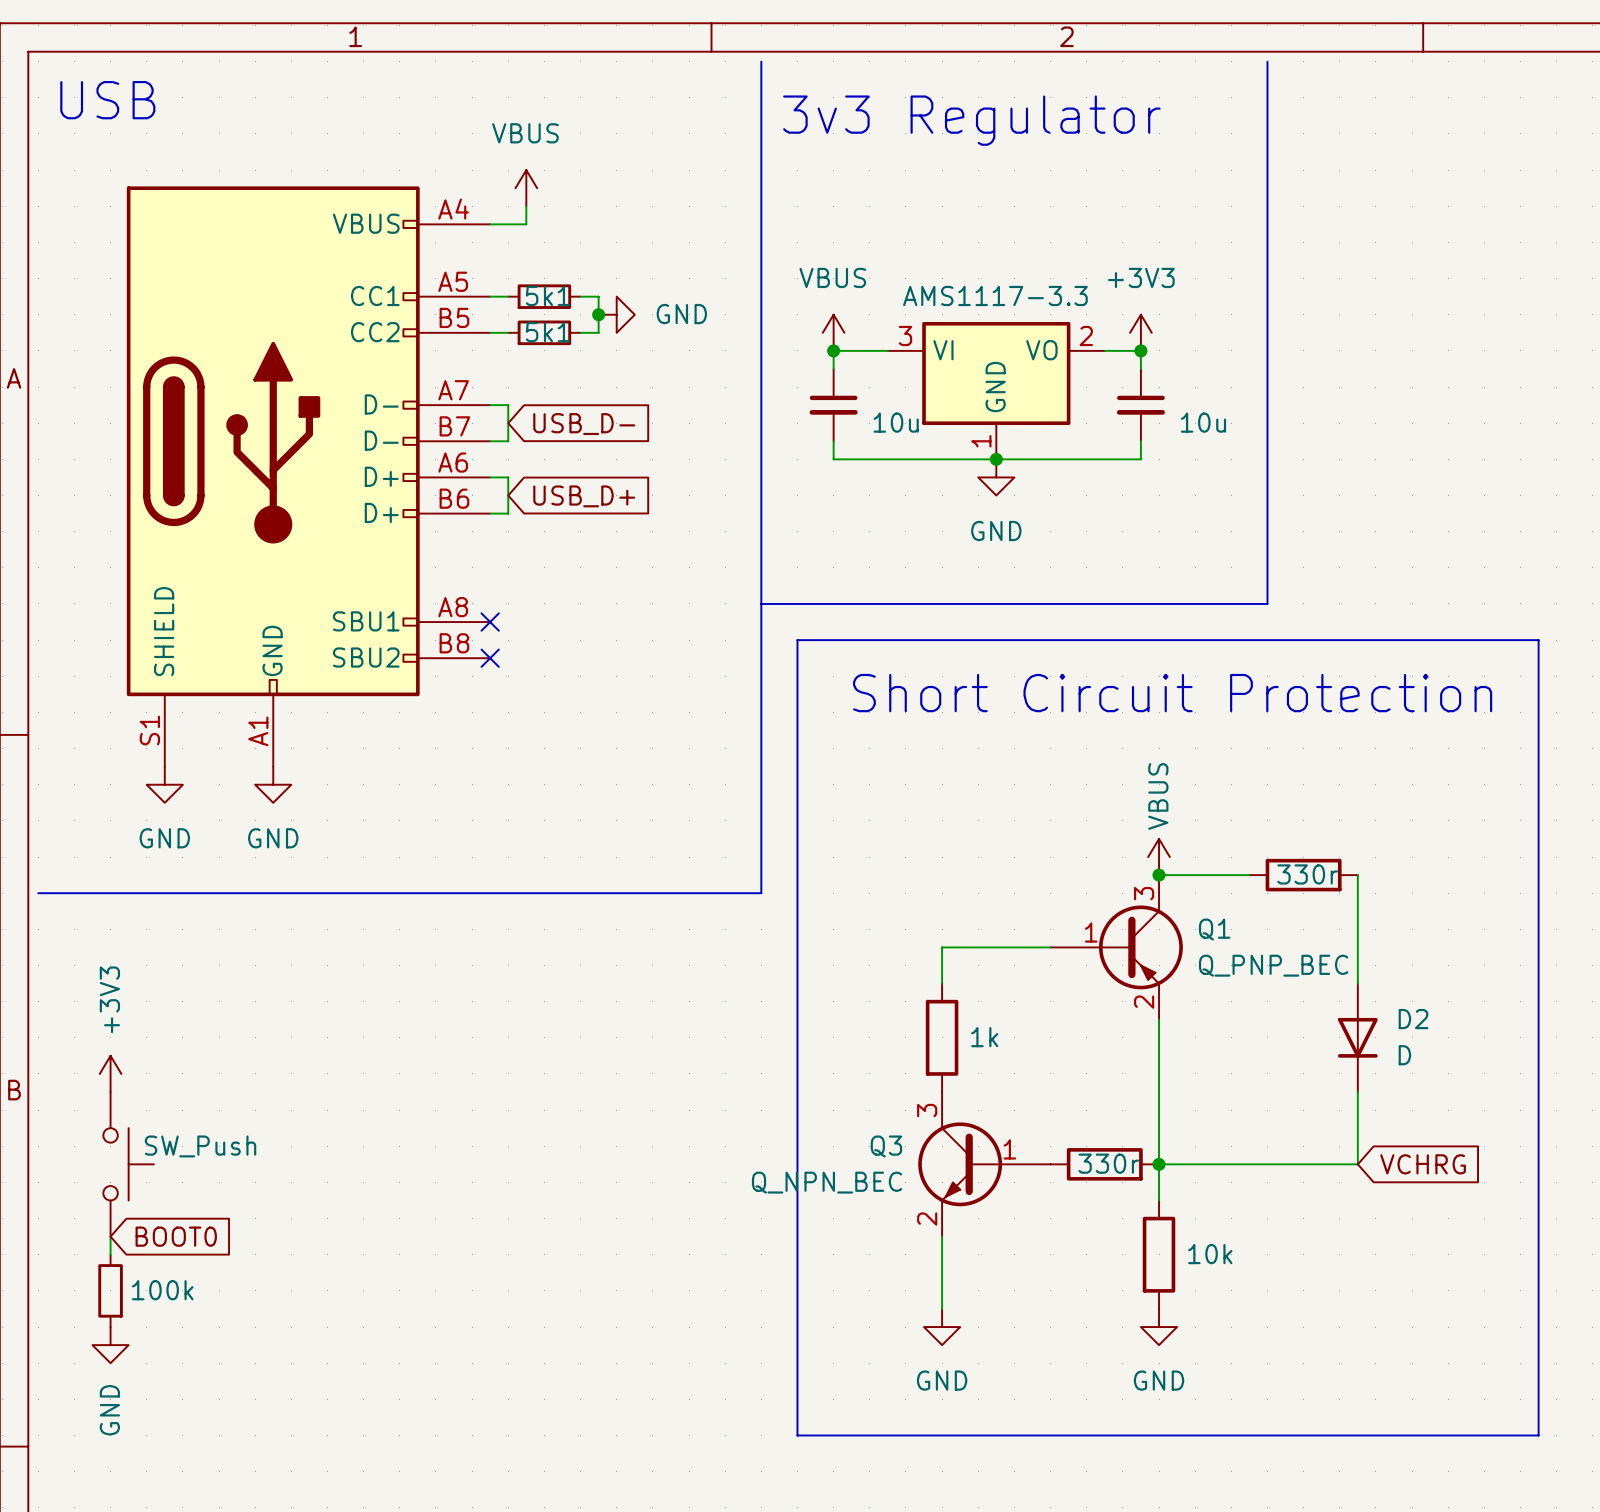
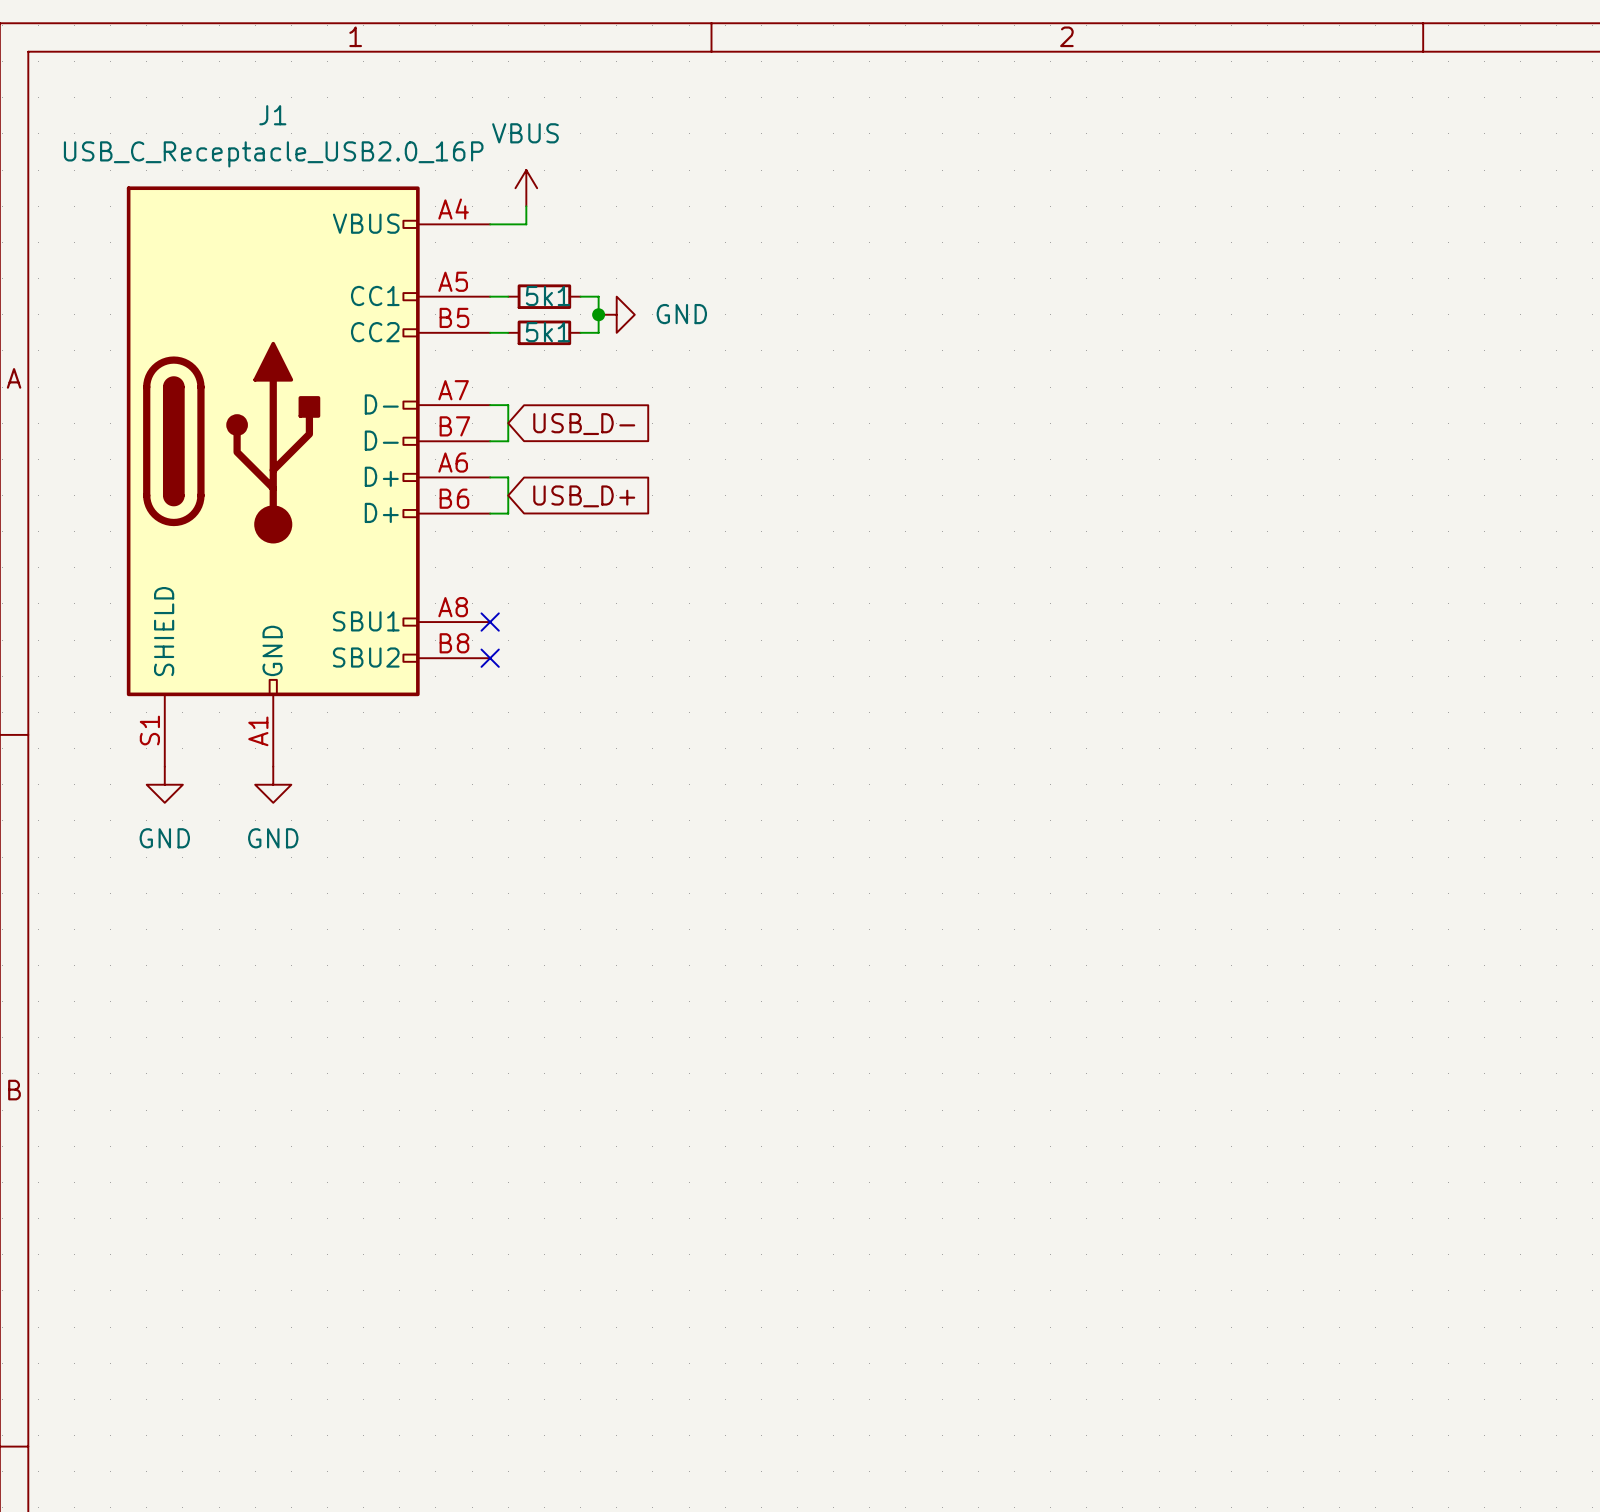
line: (761, 61) (761, 893) (38, 893) -> none
line: (1267, 61) (1267, 603) (761, 603) -> none
text: USB (107, 100) -> none
J1 name: none -> J1 (272, 115)
text: 3v3 Regulator (971, 120) -> none
J1 value: none -> USB_C_Receptacle_USB2.0_16P (273, 154)
power symbol: VBUS (833, 332) -> none
power symbol: +3V3 (1140, 332) -> none
junction: (833, 350) -> none
wire: (887, 350) (833, 350) (833, 368) -> none
wire: (1104, 350) (1140, 350) (1140, 368) -> none
junction: (1140, 350) -> none
part: AMS1117-3.3 (996, 390) -> none
part: 10u (833, 405) -> none
part: 10u (1140, 405) -> none
wire: (833, 441) (833, 459) (1140, 459) (1140, 441) -> none
junction: (996, 459) -> none
power symbol: GND (996, 477) -> none
line: (797, 640) (1538, 640) (1538, 1435) (797, 1435) (797, 640) -> none
text: Short Circuit Protection (1172, 693) -> none
power symbol: VBUS (1159, 857) -> none
wire: (1159, 875) (1249, 875) -> none
junction: (1159, 875) -> none
part: 330r (1303, 875) -> none
wire: (1357, 875) (1357, 983) -> none
wire: (1050, 947) (942, 947) (942, 983) -> none
Q1: Q_PNP_BEC (1116, 947) -> none
wire: (1159, 1019) (1159, 1200) -> none
part: 1k (942, 1037) -> none
D2: D (1357, 1037) -> none
power symbol: +3V3 (110, 1073) -> none
wire: (1357, 1092) (1357, 1164) (1159, 1164) -> none
part: SW_Push (128, 1164) -> none
Q3: Q_NPN_BEC (984, 1164) -> none
part: 330r (1104, 1164) -> none
junction: (1159, 1164) -> none
global label: VCHRG (1423, 1164) -> none
wire: (110, 1236) (110, 1254) -> none
global label: BOOT0 (176, 1236) -> none
wire: (942, 1236) (942, 1308) -> none
part: 10k (1159, 1254) -> none
part: 100k (110, 1290) -> none
power symbol: GND (942, 1327) -> none
power symbol: GND (1159, 1327) -> none
power symbol: GND (110, 1345) -> none

